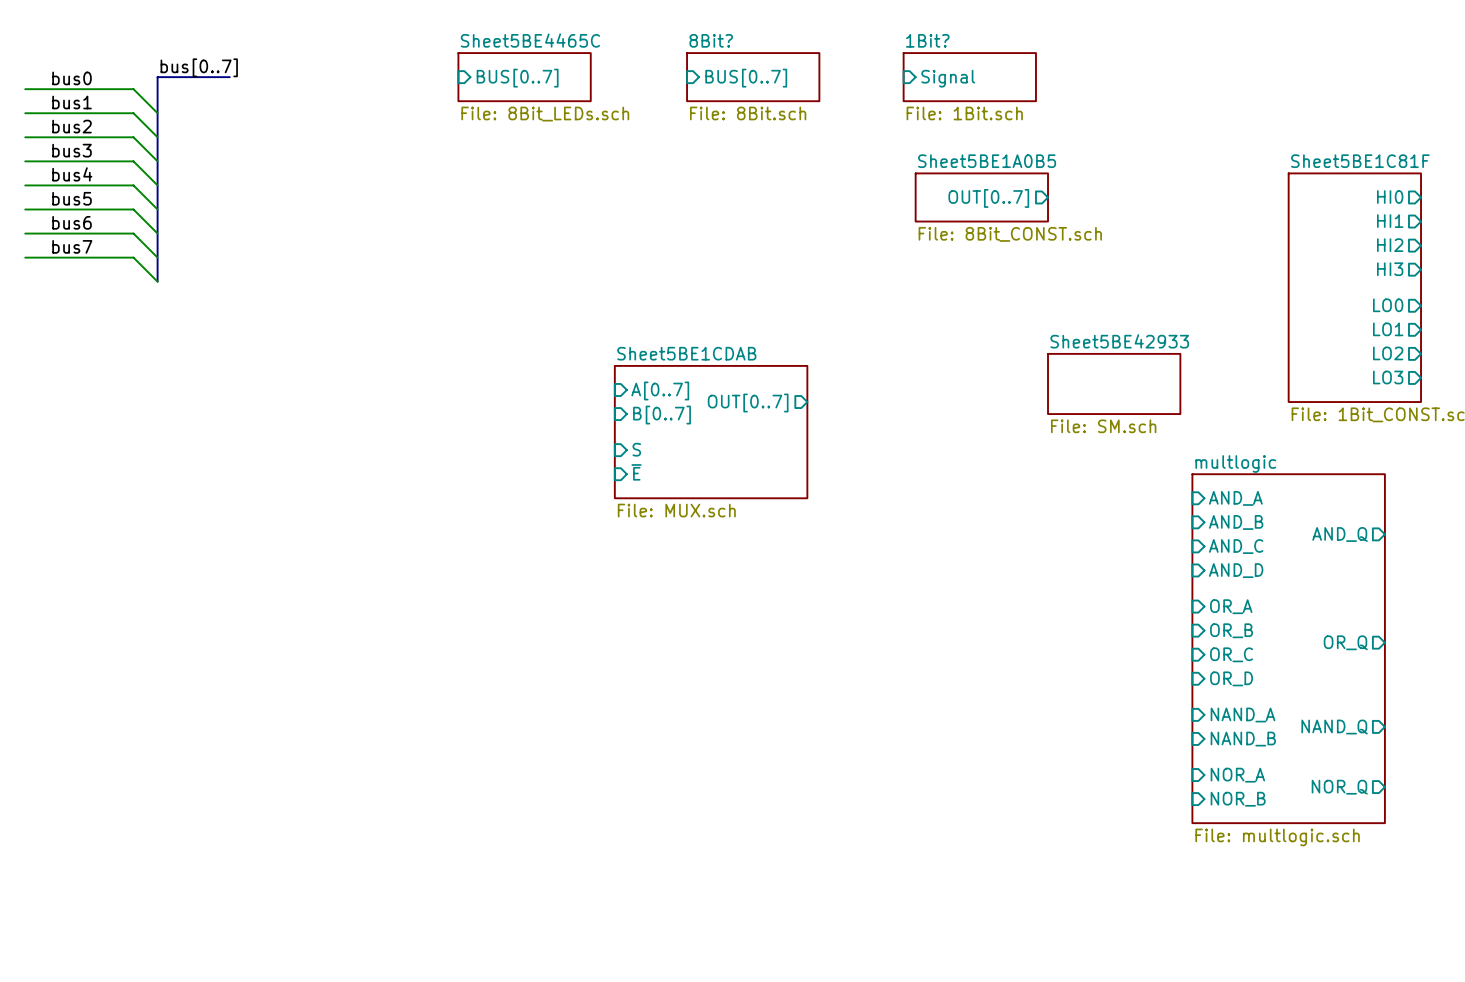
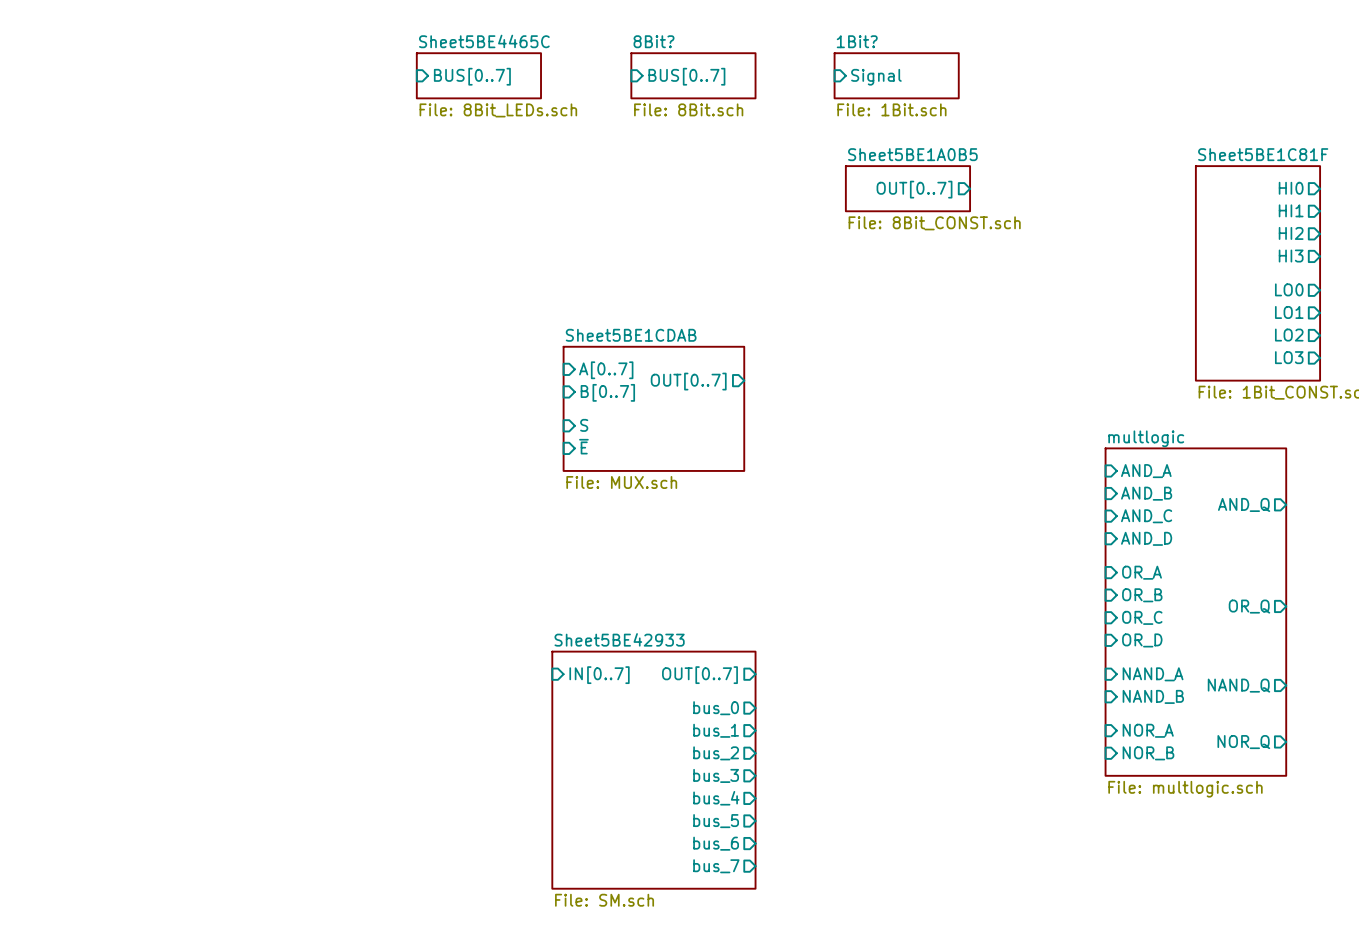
label: bus[0..7] (199, 67) -> none
bus: (229, 77) (157, 77) (157, 281) -> none
label: bus0 (72, 78) -> none
wire: (25, 89) (133, 89) (157, 113) -> none
label: bus1 (72, 102) -> none
wire: (25, 113) (133, 113) (157, 137) -> none
label: bus2 (72, 126) -> none
wire: (25, 137) (133, 137) (157, 161) -> none
label: bus3 (72, 150) -> none
wire: (25, 161) (133, 161) (157, 185) -> none
label: bus4 (72, 174) -> none
wire: (25, 185) (133, 185) (157, 209) -> none
label: bus5 (72, 198) -> none
wire: (25, 209) (133, 209) (157, 233) -> none
label: bus6 (72, 222) -> none
wire: (25, 233) (133, 233) (157, 257) -> none
label: bus7 (72, 246) -> none
wire: (25, 257) (133, 257) (157, 281) -> none
sheet Sheet5BE42933 name position: Sheet5BE42933 (1119, 341) -> Sheet5BE42933 (619, 639)
sheet Sheet5BE42933 shape: [1048, 353, 1181, 415] -> [552, 651, 756, 889]
sheet Sheet5BE42933 value position: File: SM.sch (1103, 426) -> File: SM.sch (604, 900)
sheet pin: none -> IN[0..7] (599, 675)
sheet pin: none -> OUT[0..7] (699, 675)
sheet pin: none -> bus_0 (716, 708)
sheet pin: none -> bus_1 (716, 730)
sheet pin: none -> bus_2 (716, 753)
sheet pin: none -> bus_3 (716, 775)
sheet pin: none -> bus_4 (716, 798)
sheet pin: none -> bus_5 (716, 821)
sheet pin: none -> bus_6 (716, 843)
sheet pin: none -> bus_7 (716, 866)

